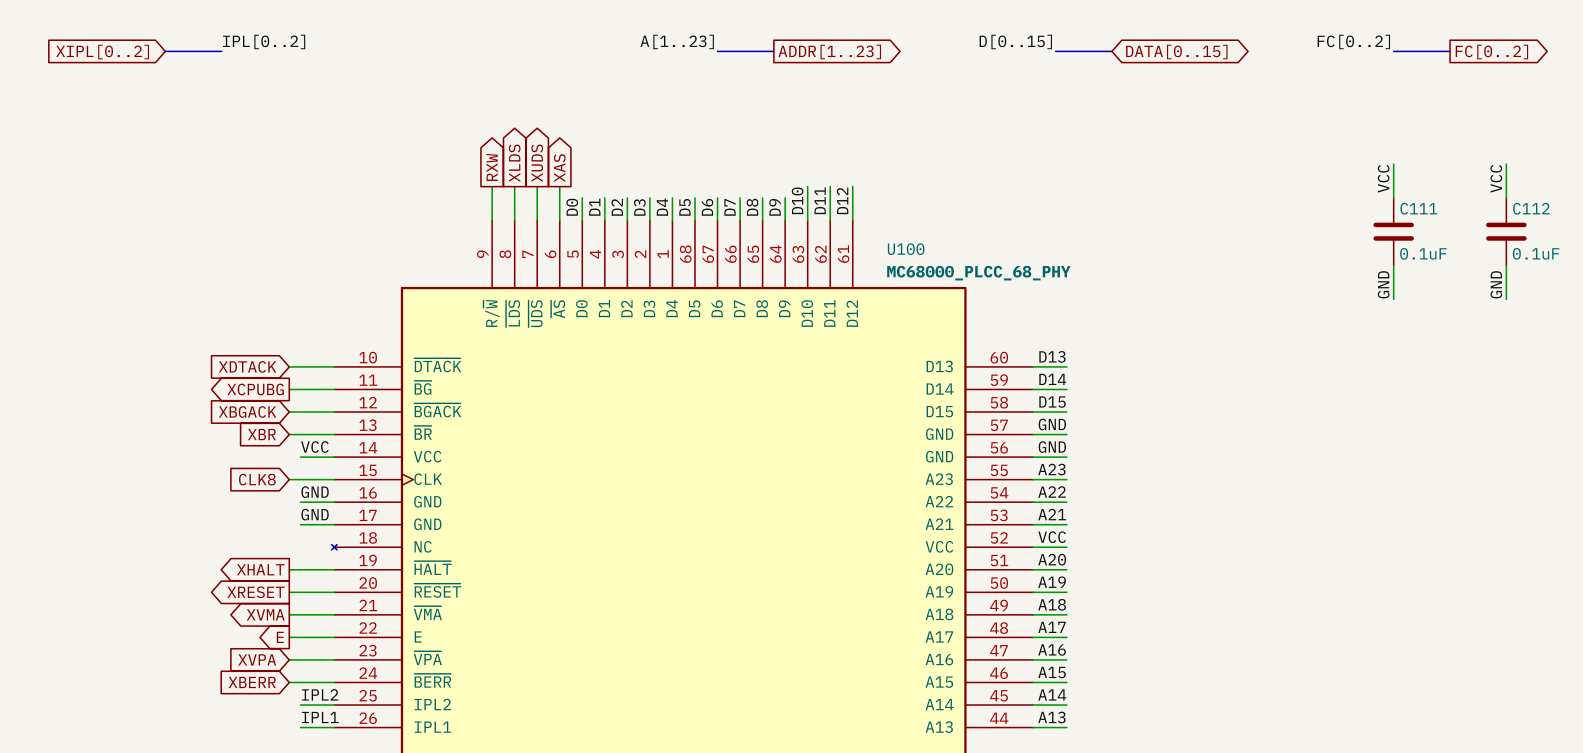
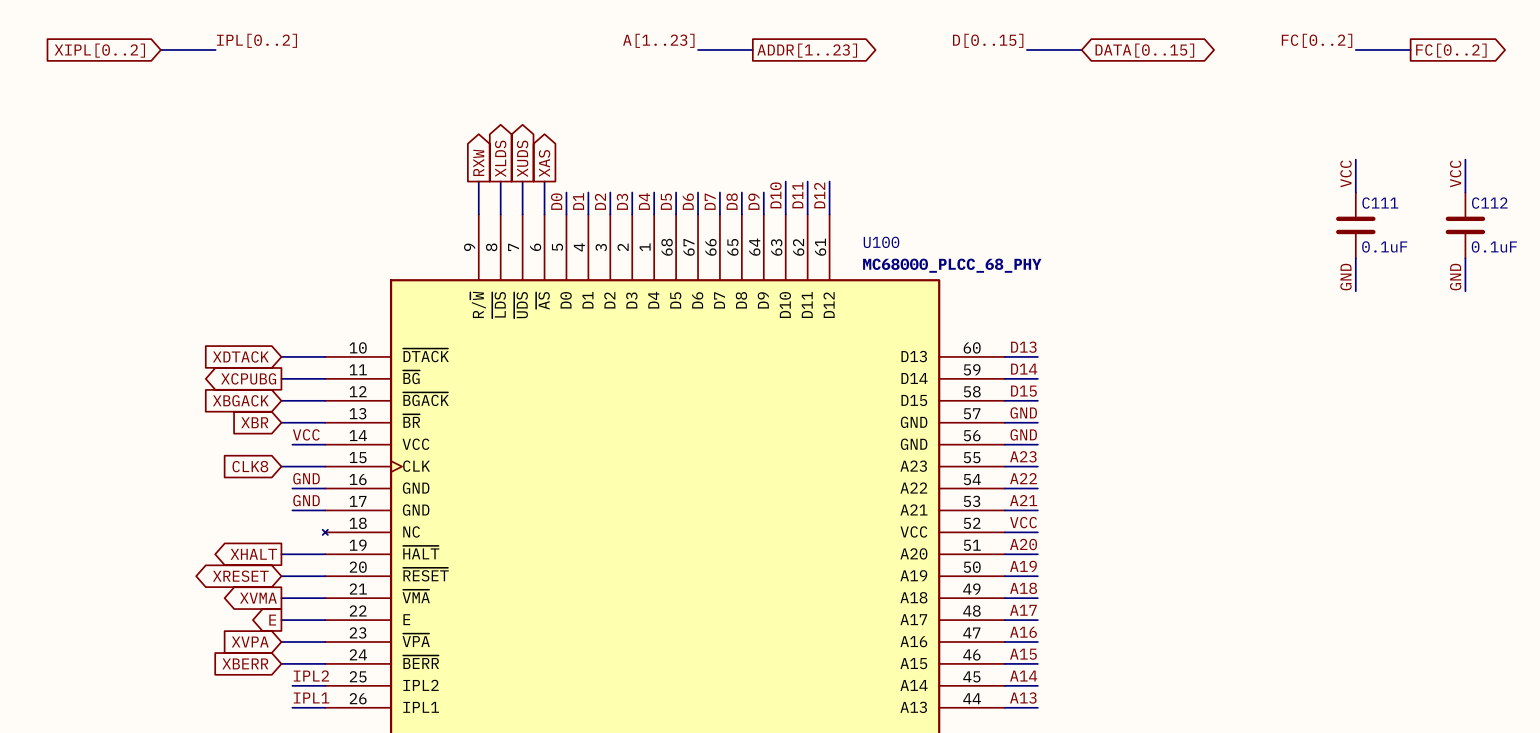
global label shape: output (256, 592) -> bidirectional (240, 576)

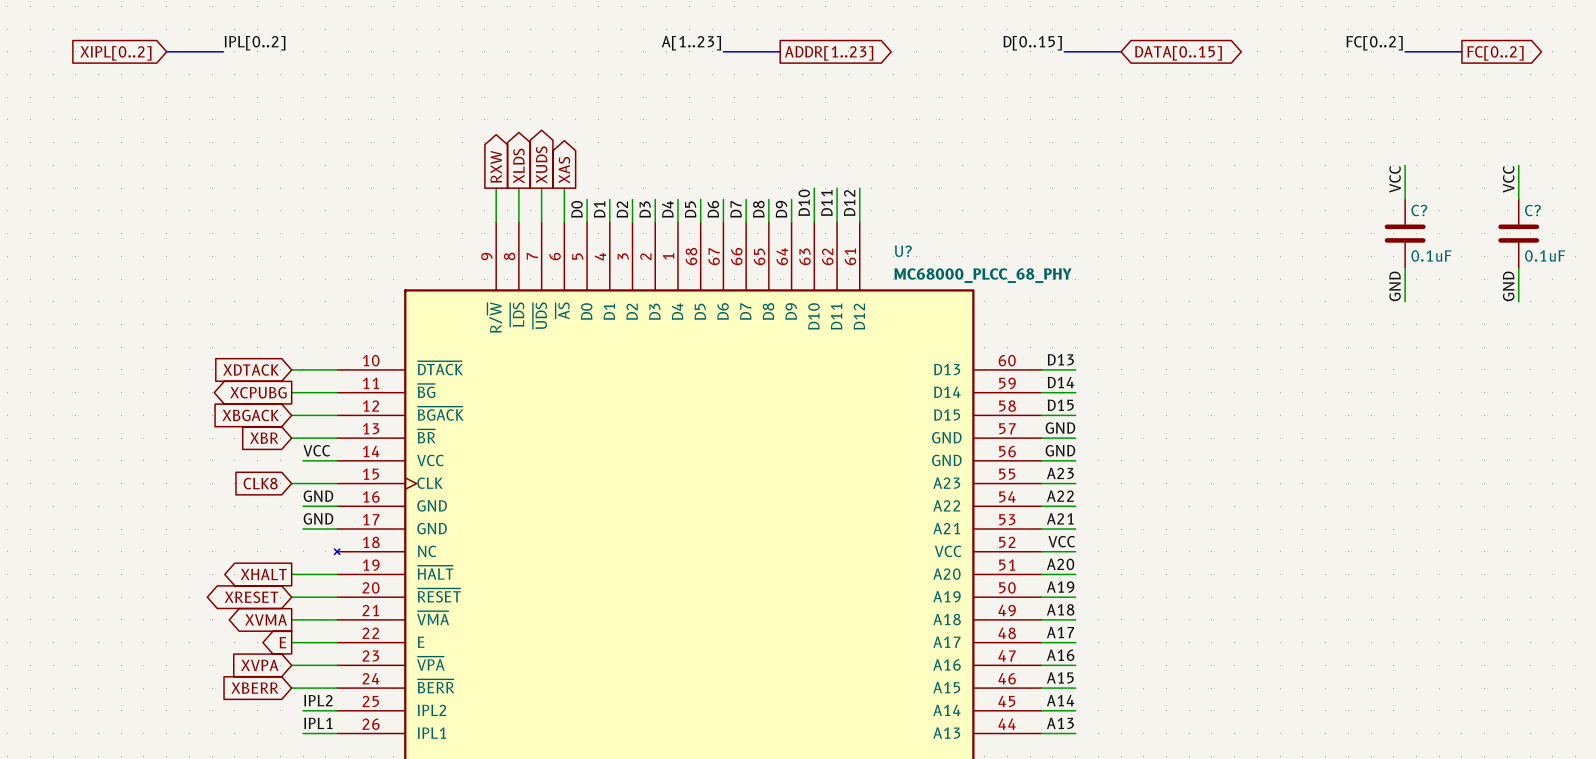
C111 name: C111 (1380, 203) -> C? (1419, 210)
C112 name: C112 (1489, 203) -> C? (1532, 210)
U100 name: U100 (881, 242) -> U? (903, 251)

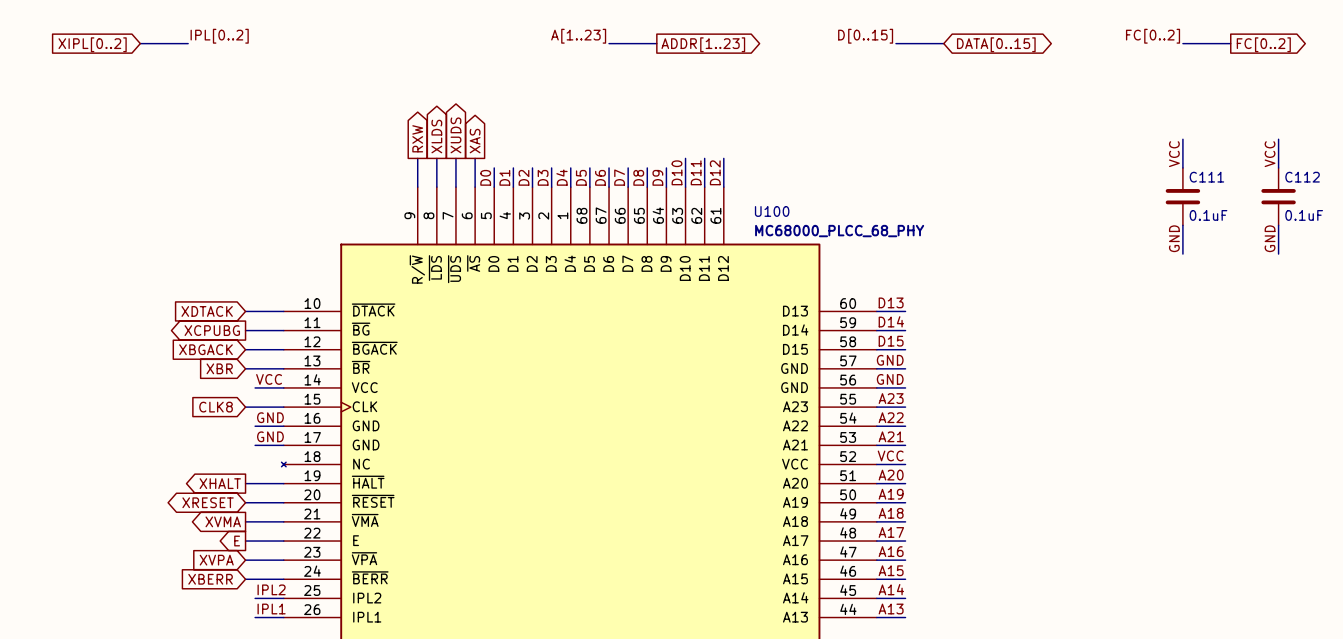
C? name: C? (1419, 210) -> C111 (1206, 177)
C? name: C? (1532, 210) -> C112 (1302, 177)
U? name: U? (903, 251) -> U100 (772, 211)

